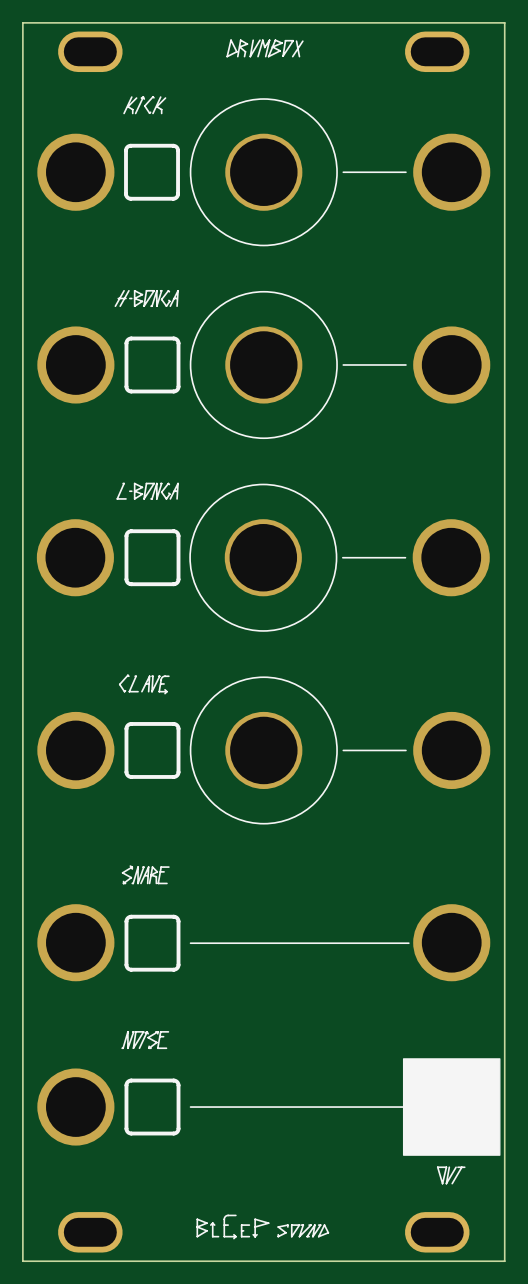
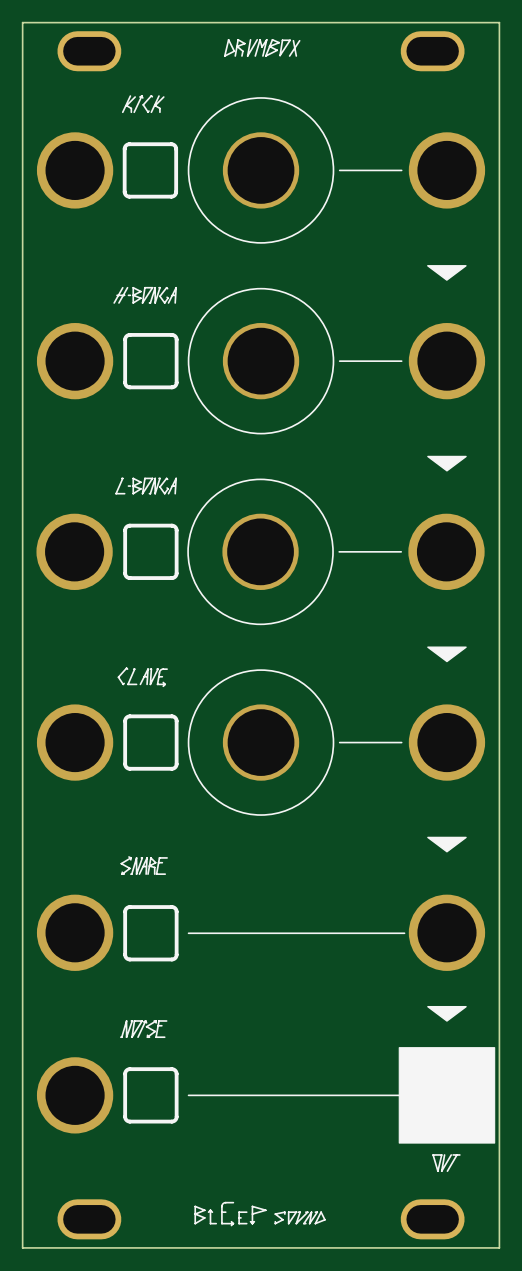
drawing: none -> [427, 265, 467, 281]
drawing: none -> [427, 455, 467, 472]
drawing: none -> [427, 646, 467, 663]
drawing: none -> [427, 836, 467, 853]
drawing: none -> [427, 1005, 467, 1022]

